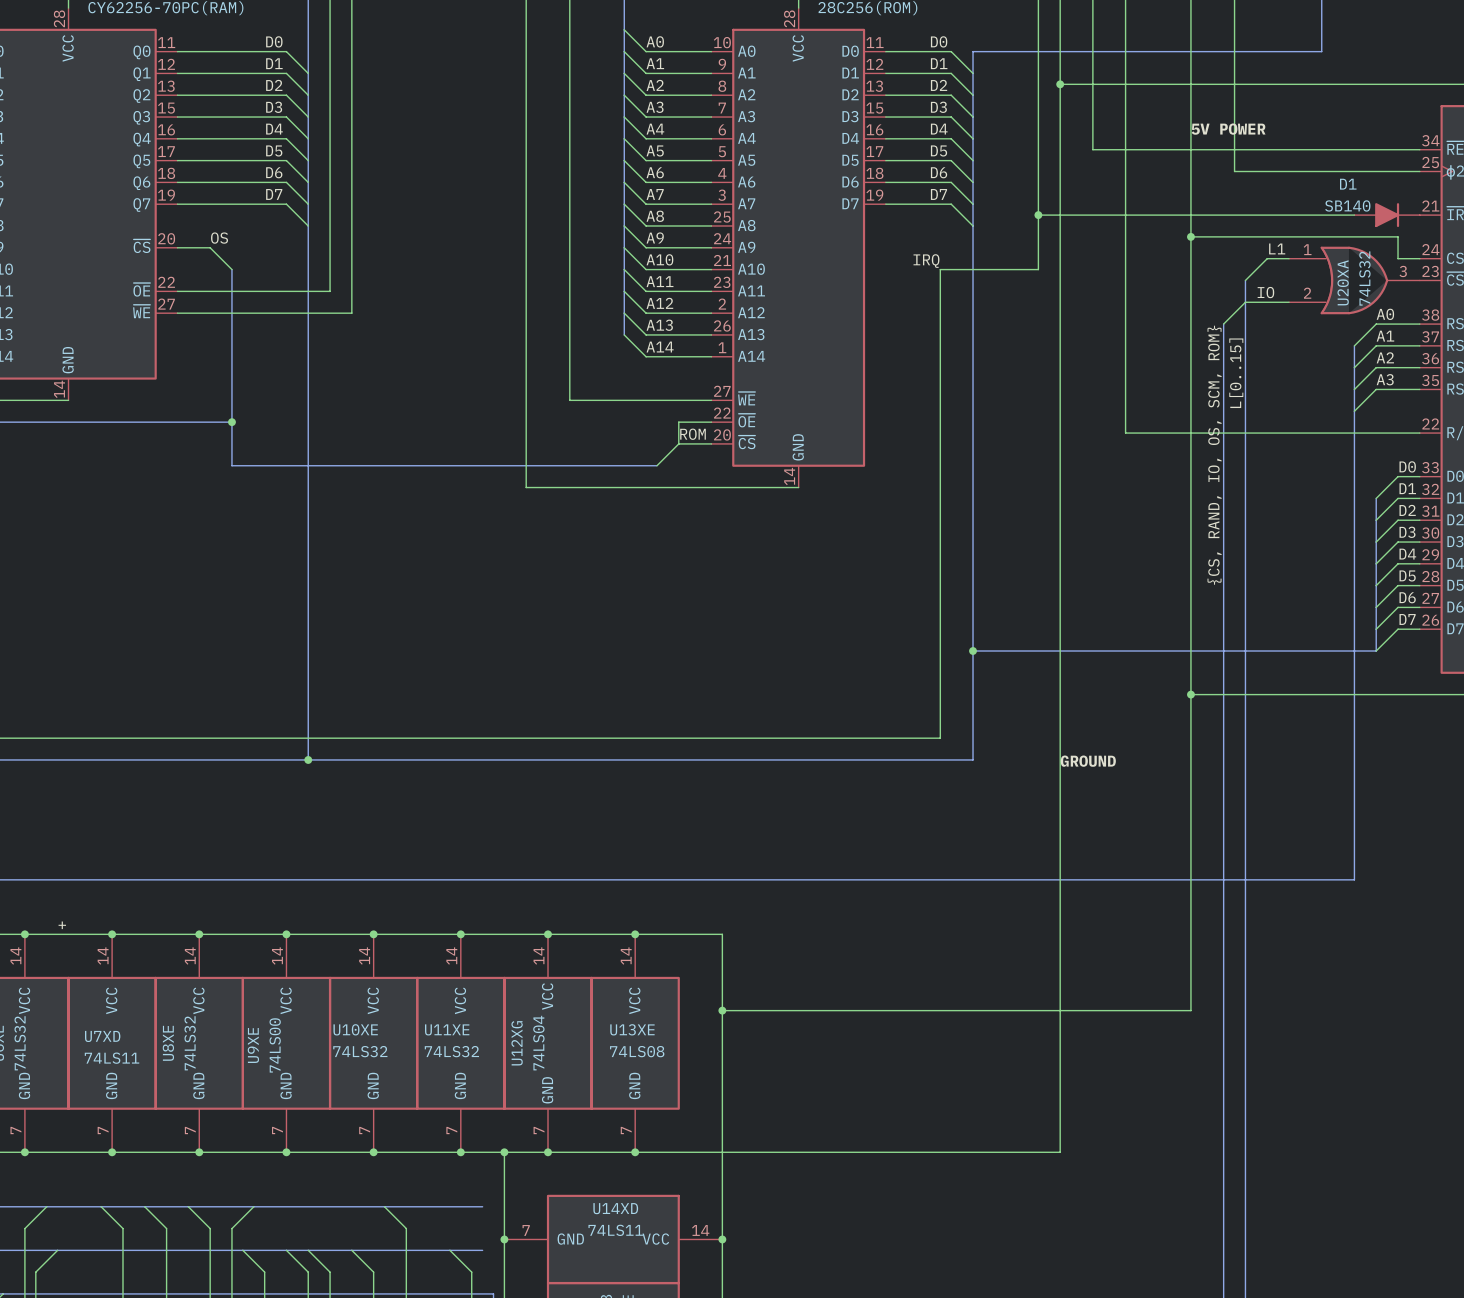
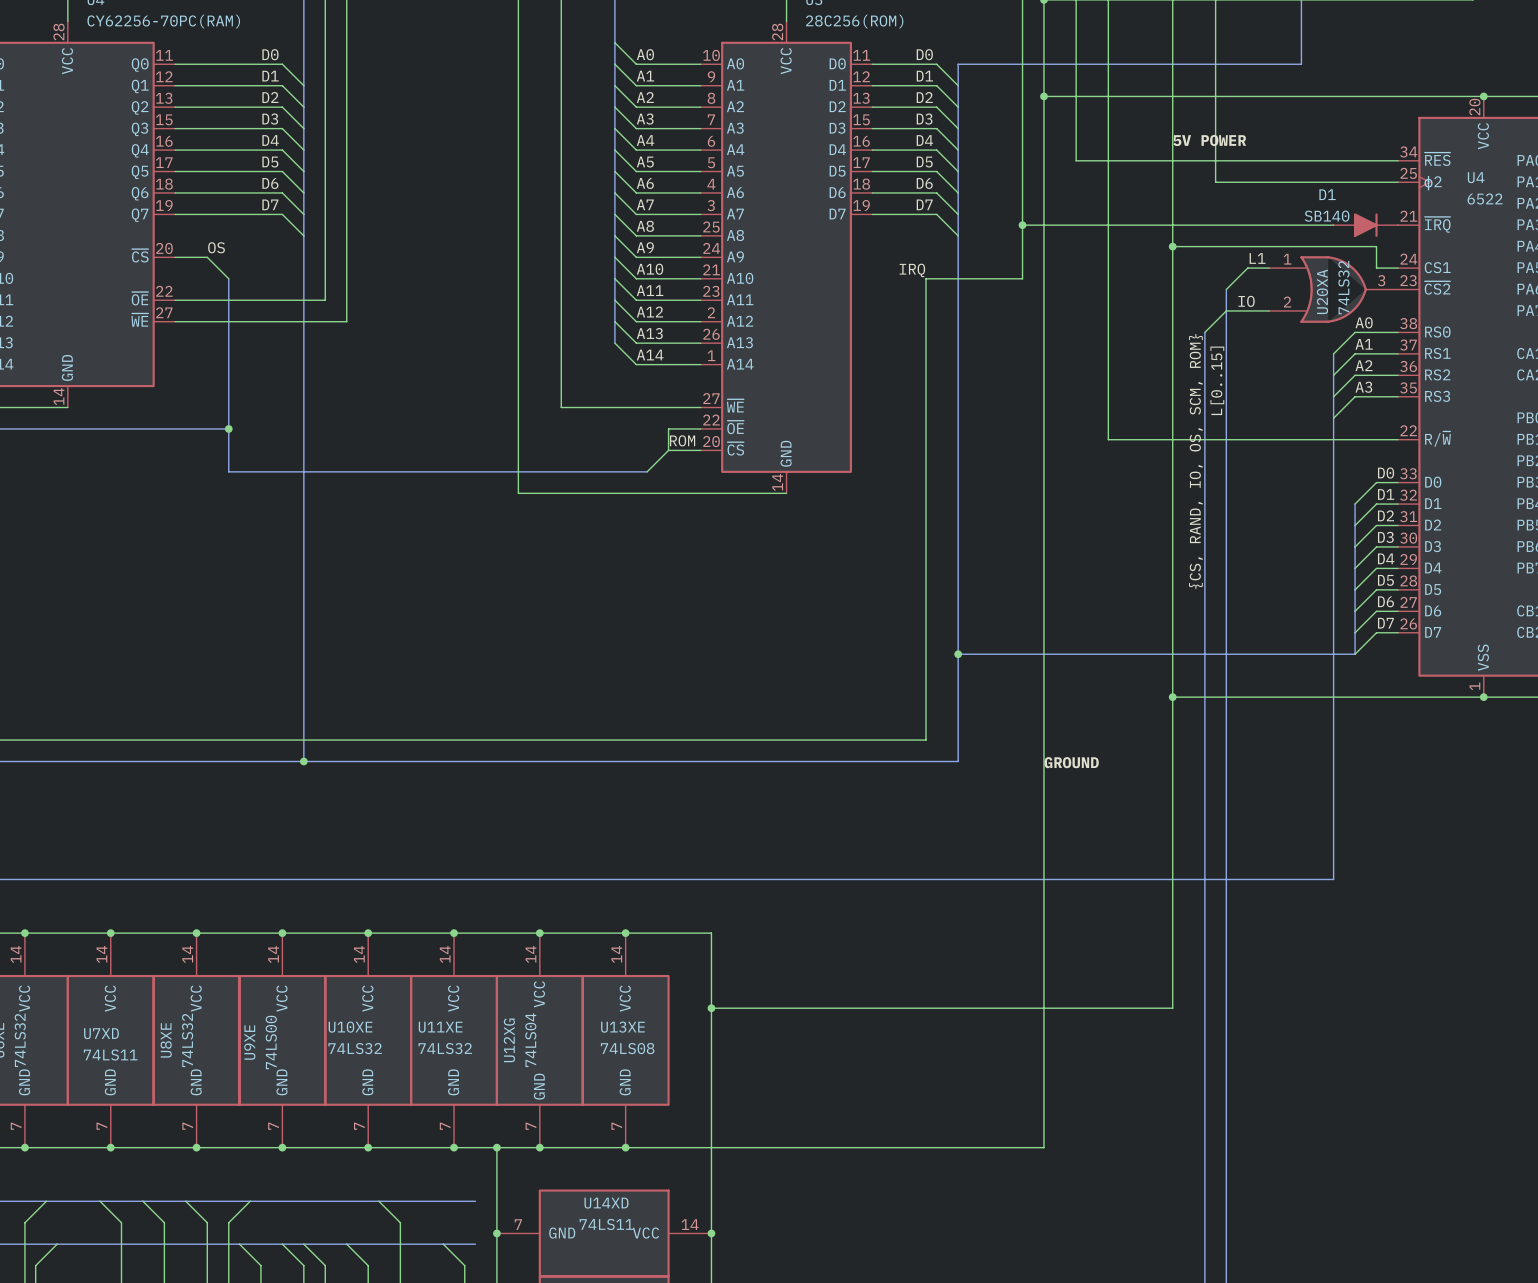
label: + (62, 925) -> none

